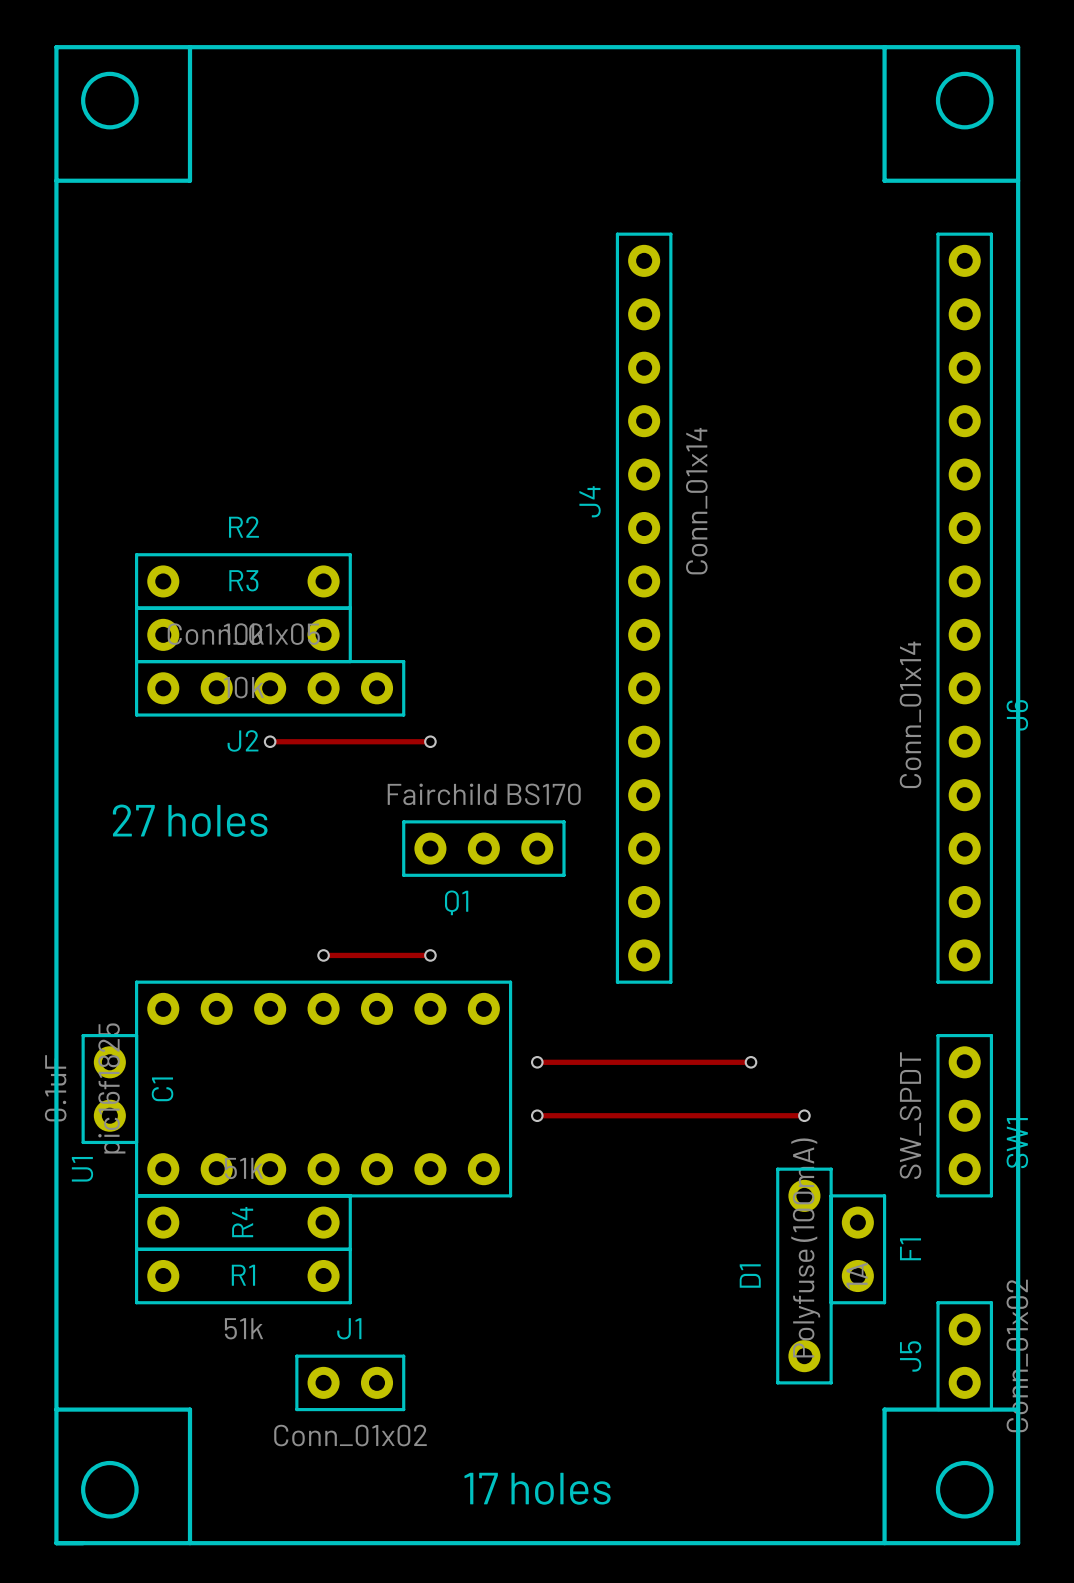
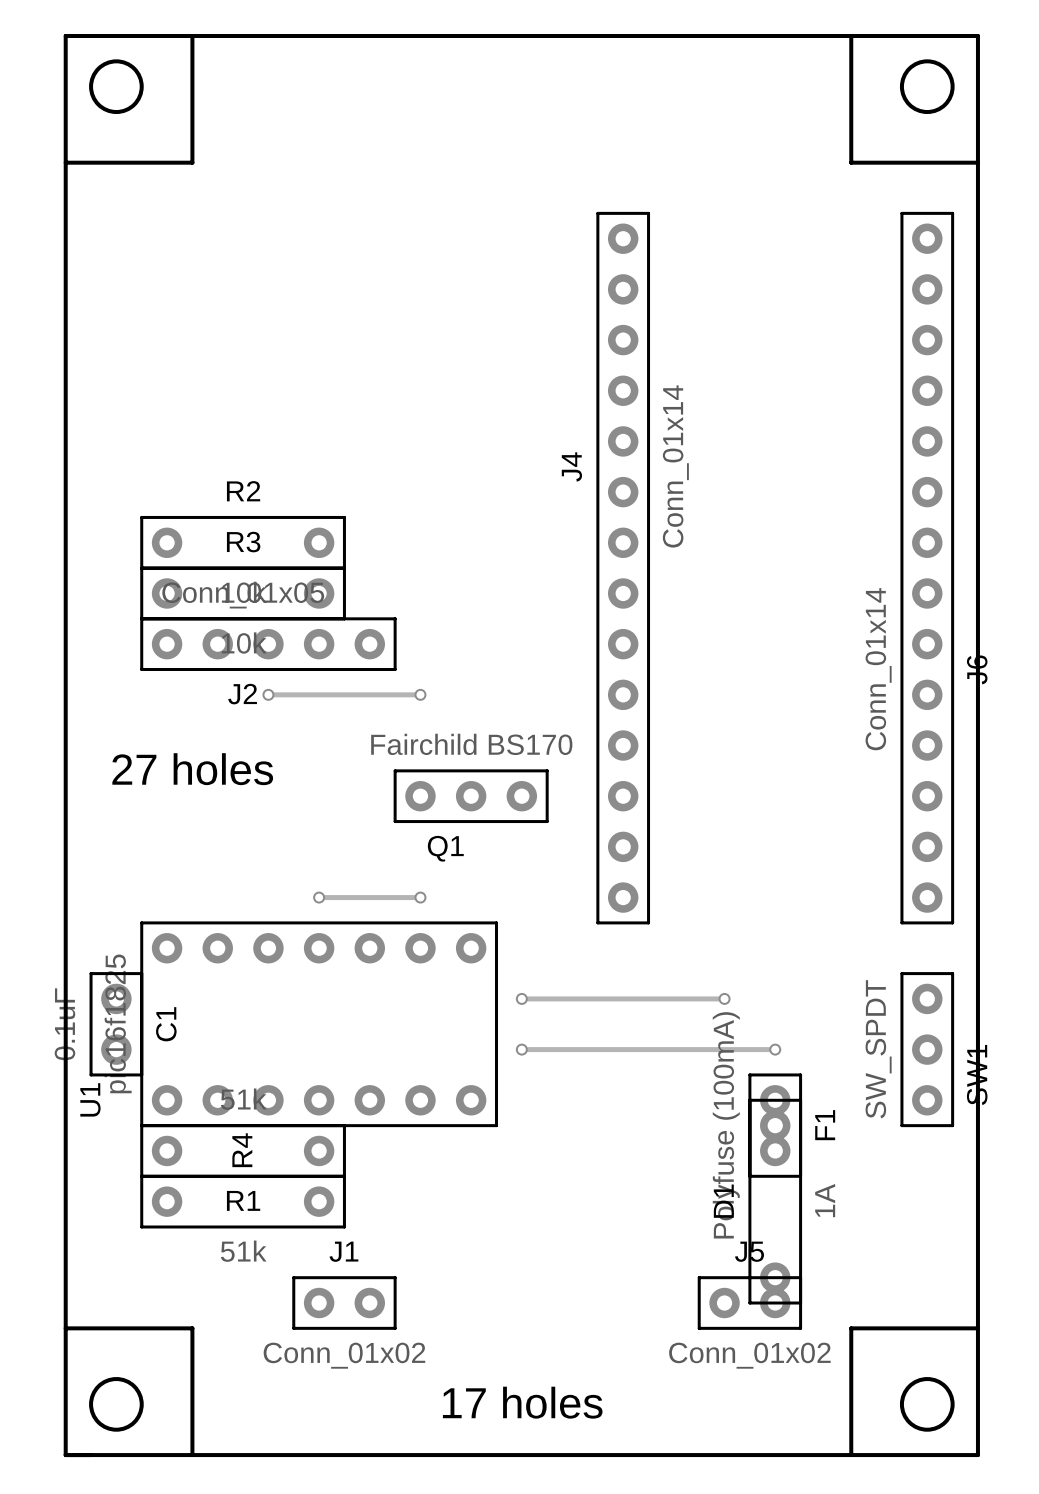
F1 position: (857, 1249) -> (775, 1125)
J5 rotation: 0° (964, 1356) -> 90° clockwise (749, 1303)
J5 position: (964, 1356) -> (749, 1303)

